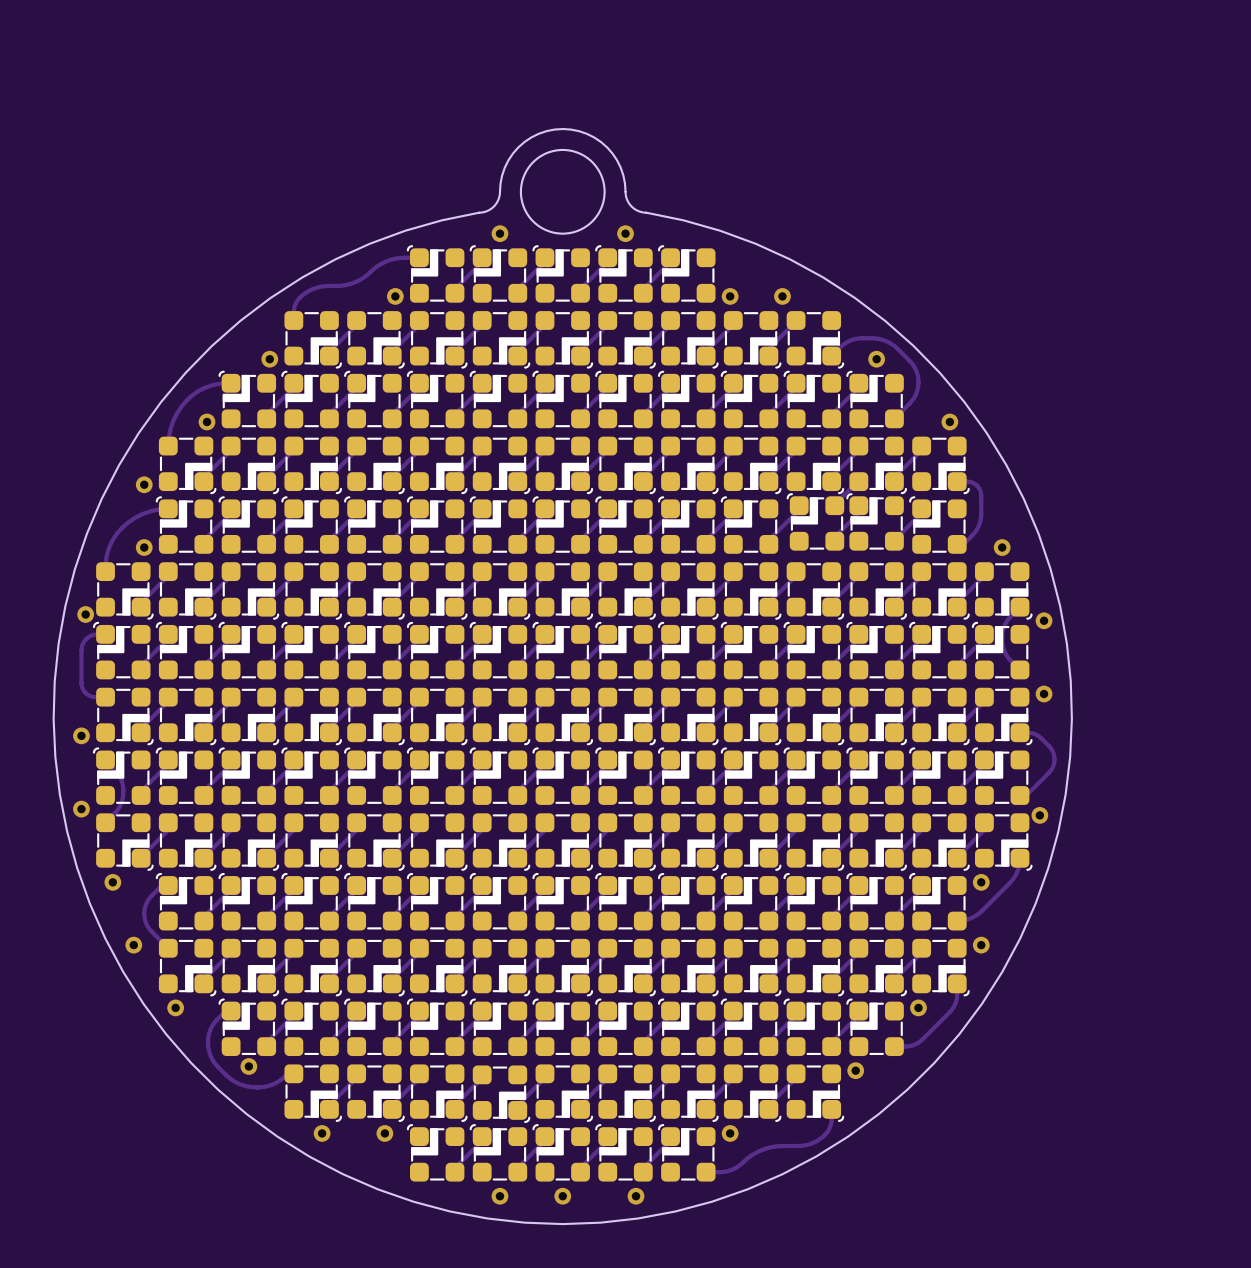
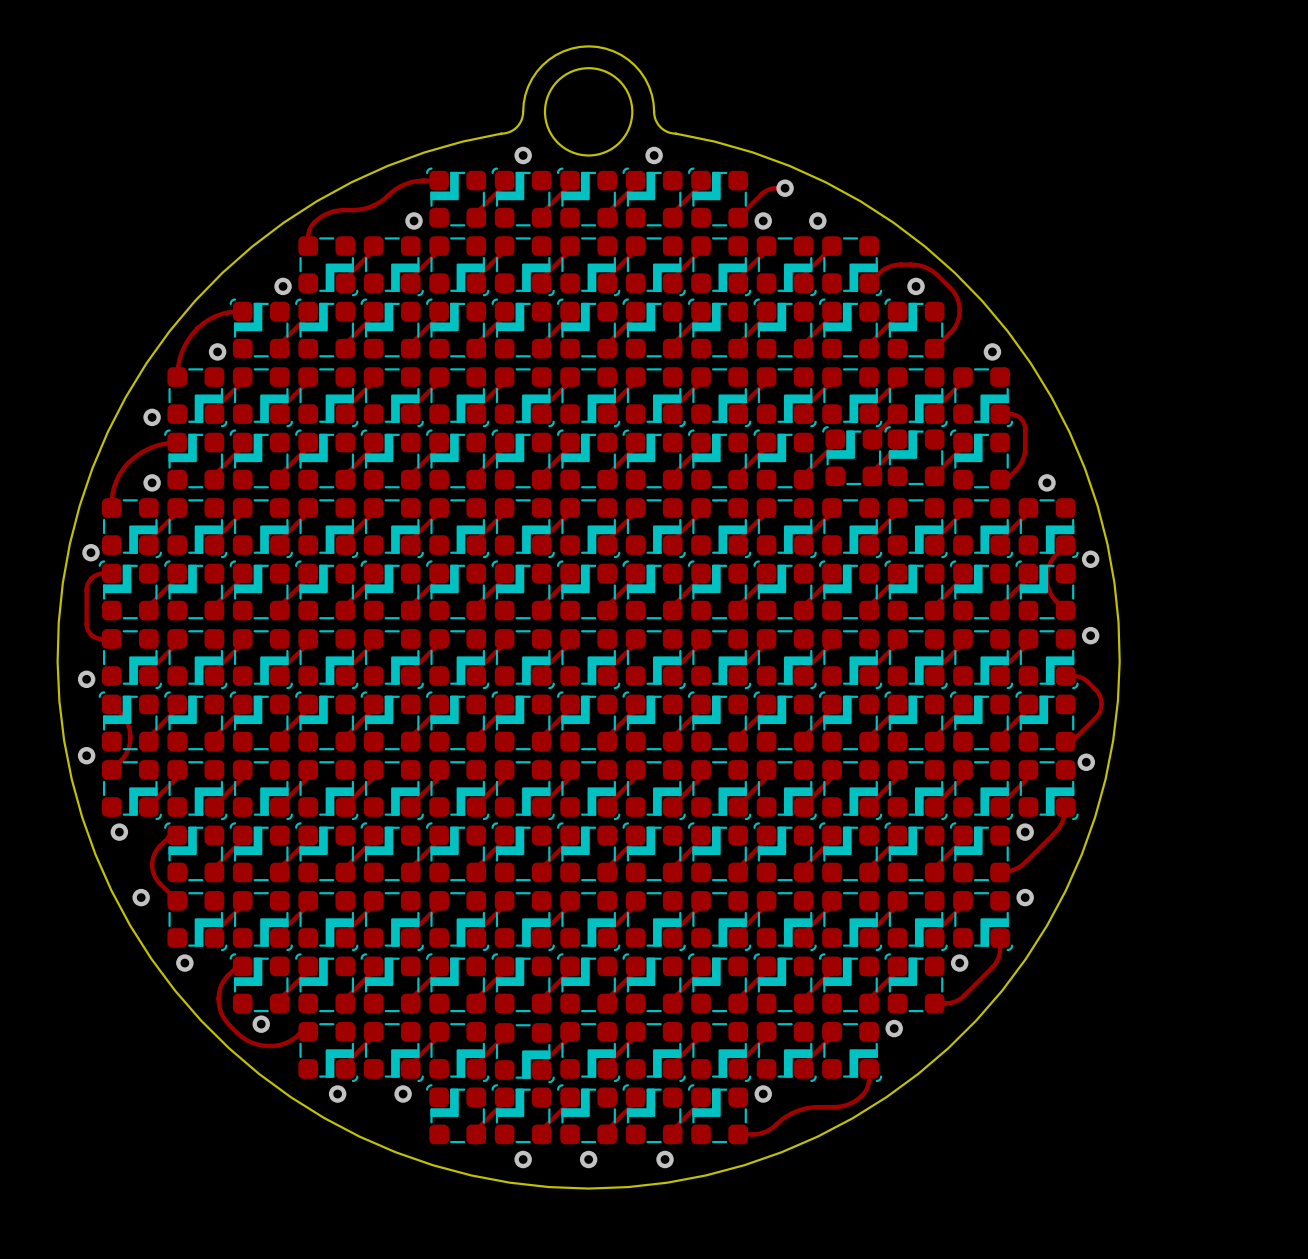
track: none -> (785, 188) (772, 188) (764, 191) (738, 217)
via: none -> (785, 188)

